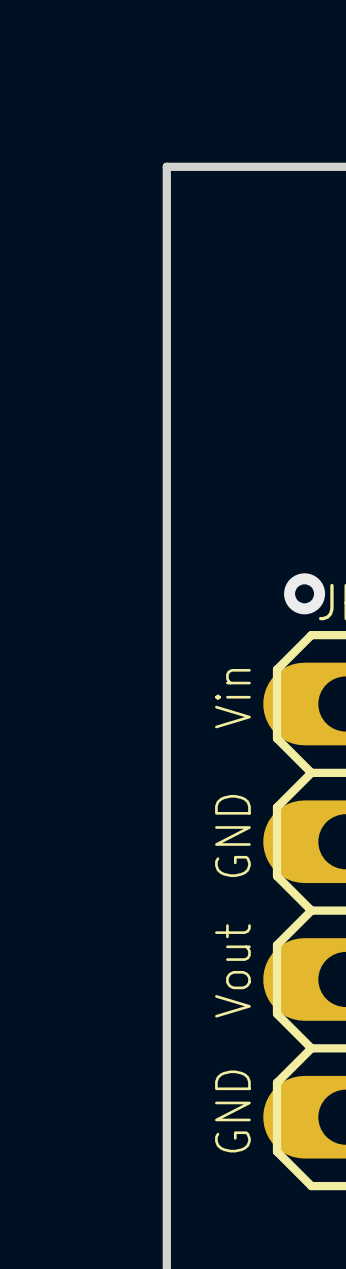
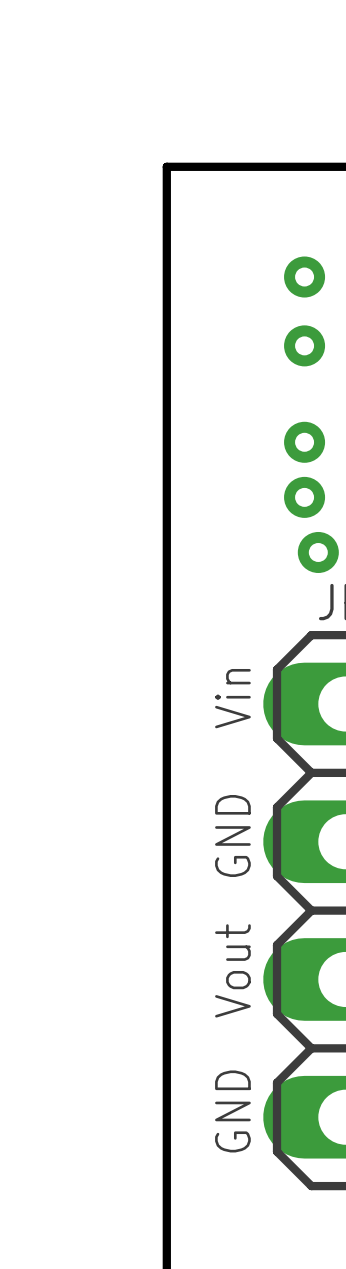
via: none -> (304, 277)
via: none -> (304, 345)
via: none -> (304, 442)
via: none -> (304, 497)
via: none -> (318, 552)
via: (304, 593) -> none

